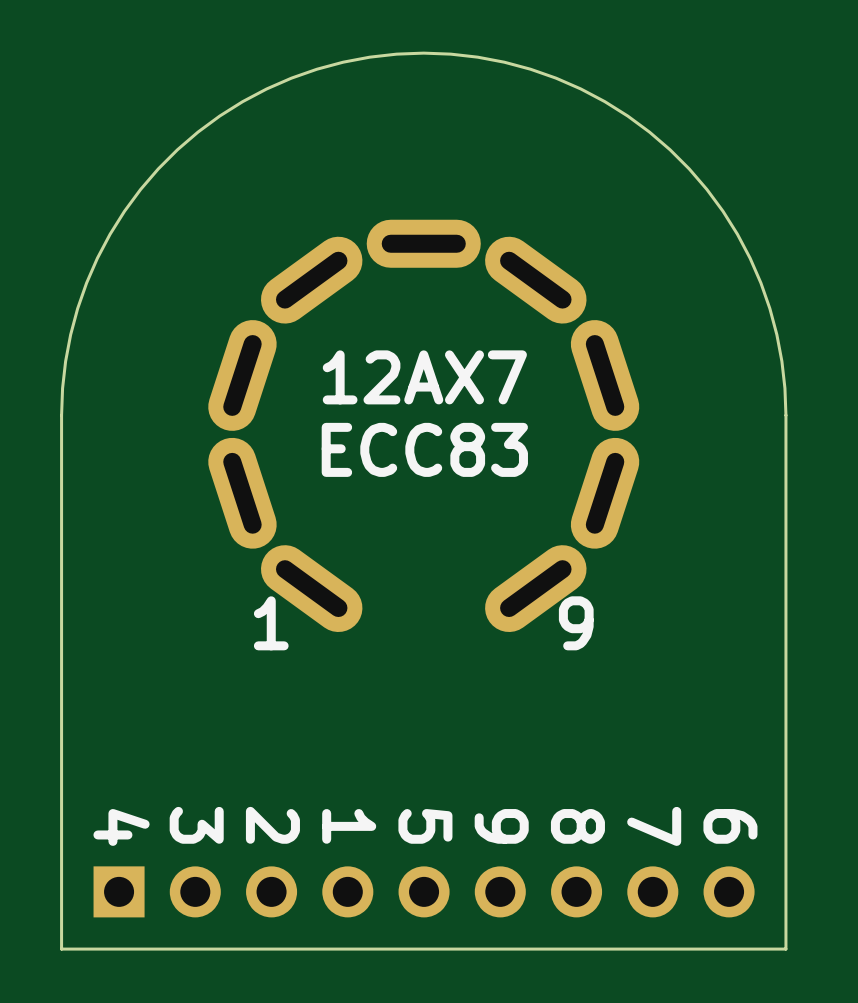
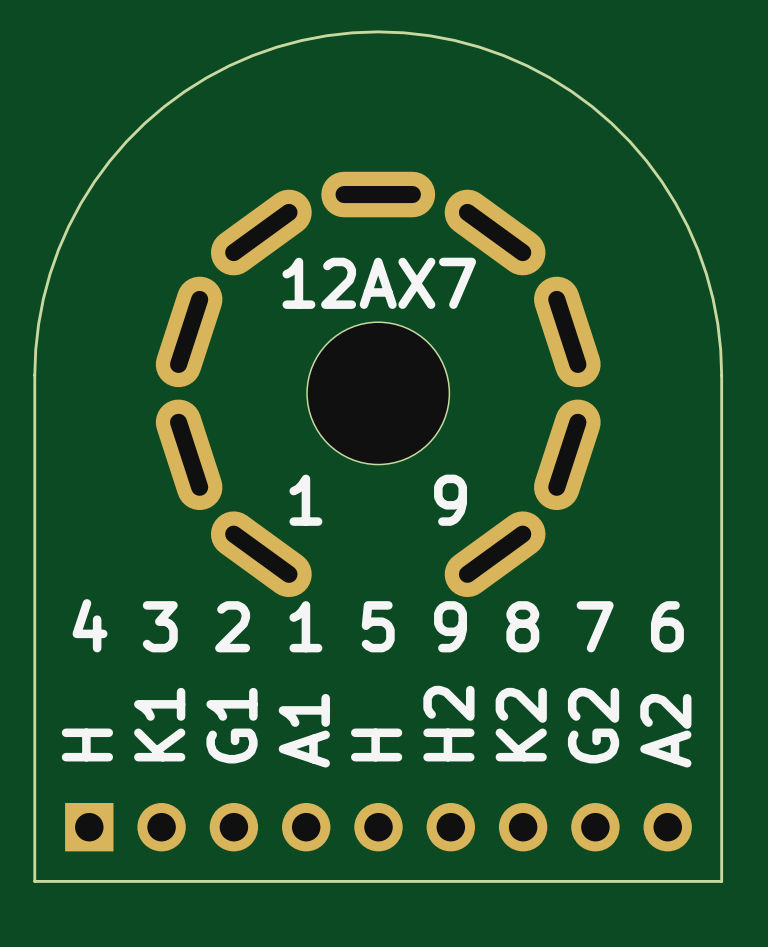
part footprint: [208, 219, 640, 633] -> [155, 171, 601, 598]
text position: 12AX7 (424, 377) -> 12AX7 (379, 283)
text: ECC83 (424, 449) -> none
text: none -> 1 (305, 500)
text: none -> 9 (450, 500)
text: 1 (271, 623) -> none
text: 9 (576, 623) -> none
text: none -> 1 (305, 626)
text: none -> 9 (450, 626)
text: none -> K1 (159, 724)
text: none -> K2 (521, 724)
text: none -> G1 (232, 725)
text: none -> G2 (593, 725)
text: none -> A2 (665, 730)
text: none -> H (87, 744)
text: none -> H (376, 744)
text rotation: 0° (196, 825) -> 90° counterclockwise (160, 626)
text position: 3 (196, 825) -> 3 (160, 626)
text rotation: 0° (272, 825) -> 90° counterclockwise (232, 626)
text position: 2 (272, 825) -> 2 (232, 626)
text: 1 (349, 826) -> A1 (304, 730)
text rotation: 0° (425, 826) -> 90° counterclockwise (378, 626)
text position: 5 (425, 826) -> 5 (378, 626)
text: 9 (501, 826) -> H2 (448, 723)
text rotation: 0° (577, 826) -> 90° counterclockwise (522, 626)
text position: 8 (577, 826) -> 8 (522, 626)
text rotation: 0° (654, 826) -> 90° counterclockwise (595, 626)
text position: 7 (654, 826) -> 7 (595, 626)
text rotation: 0° (730, 826) -> 90° counterclockwise (667, 626)
text position: 6 (730, 826) -> 6 (667, 626)
text rotation: 0° (121, 827) -> 90° counterclockwise (90, 625)
text position: 4 (121, 827) -> 4 (90, 625)

